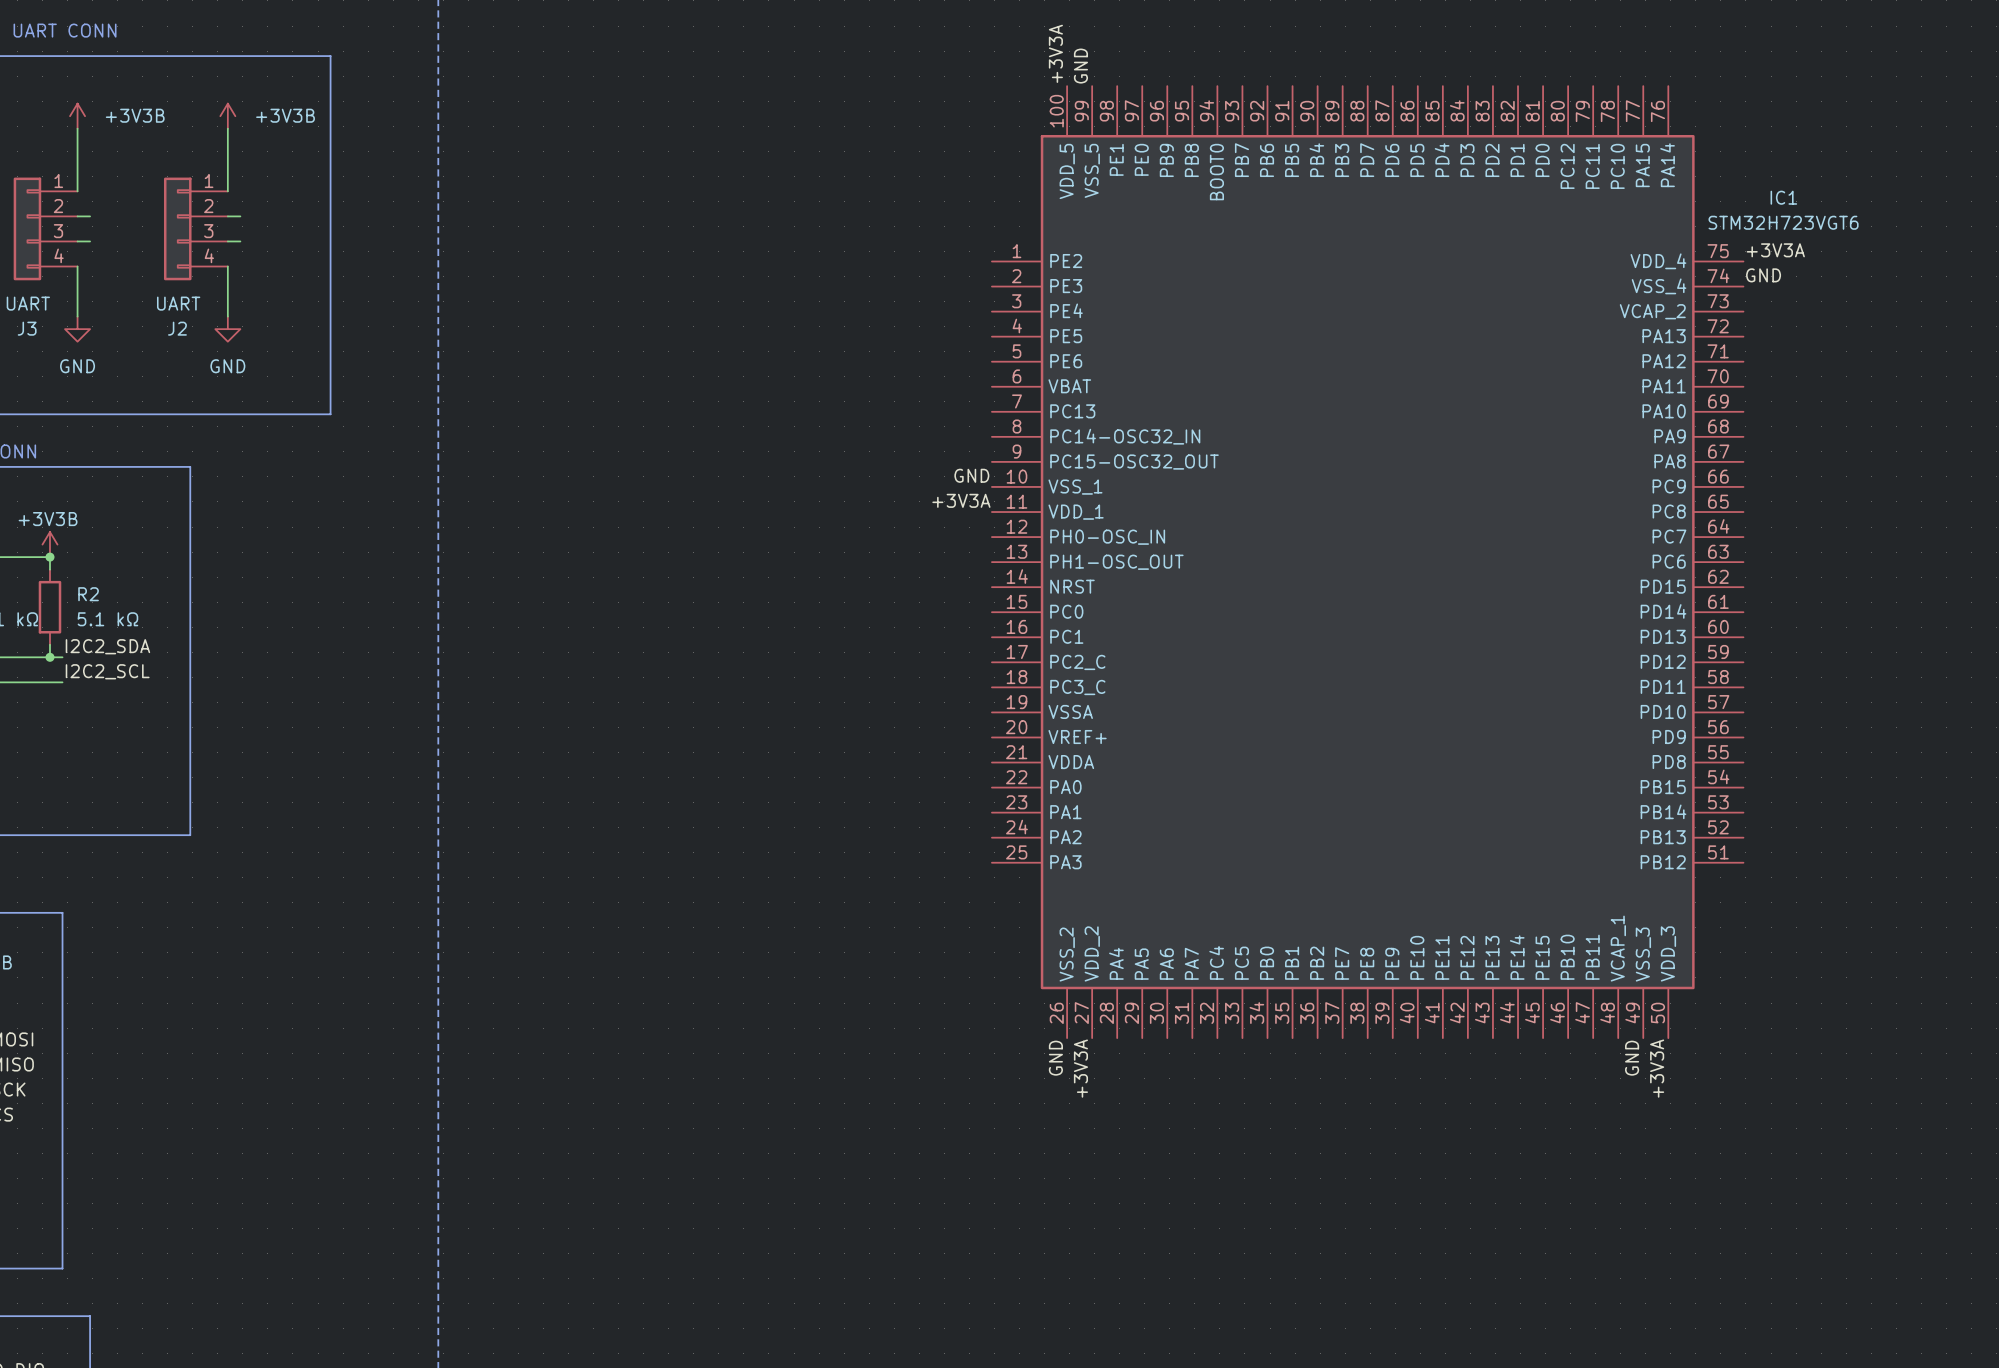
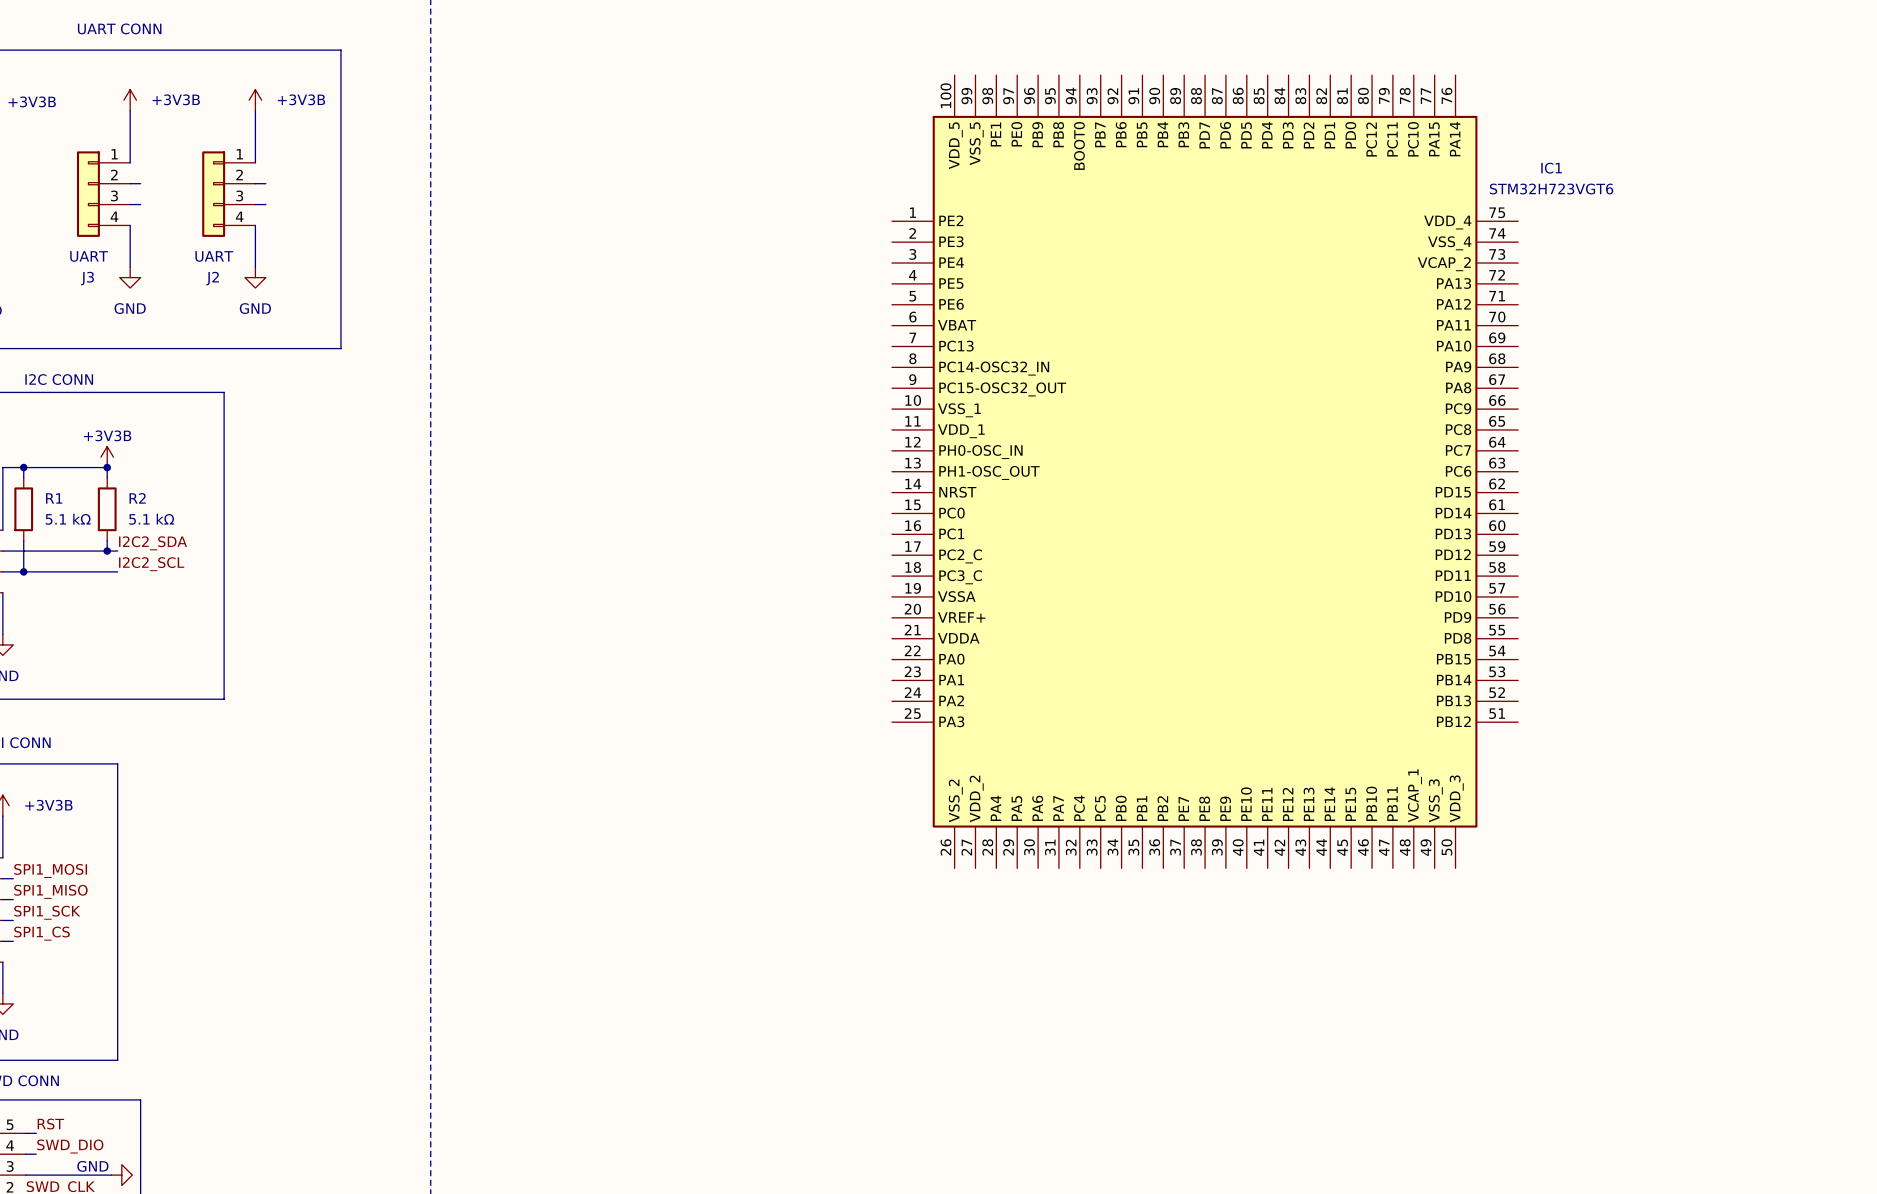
label: +3V3A (1055, 53) -> none
label: GND (1080, 66) -> none
label: +3V3A (1775, 250) -> none
label: GND (1763, 275) -> none
label: GND (971, 475) -> none
label: +3V3A (961, 500) -> none
label: GND (1055, 1058) -> none
label: GND (1632, 1058) -> none
label: +3V3A (1080, 1068) -> none
label: +3V3A (1657, 1068) -> none

